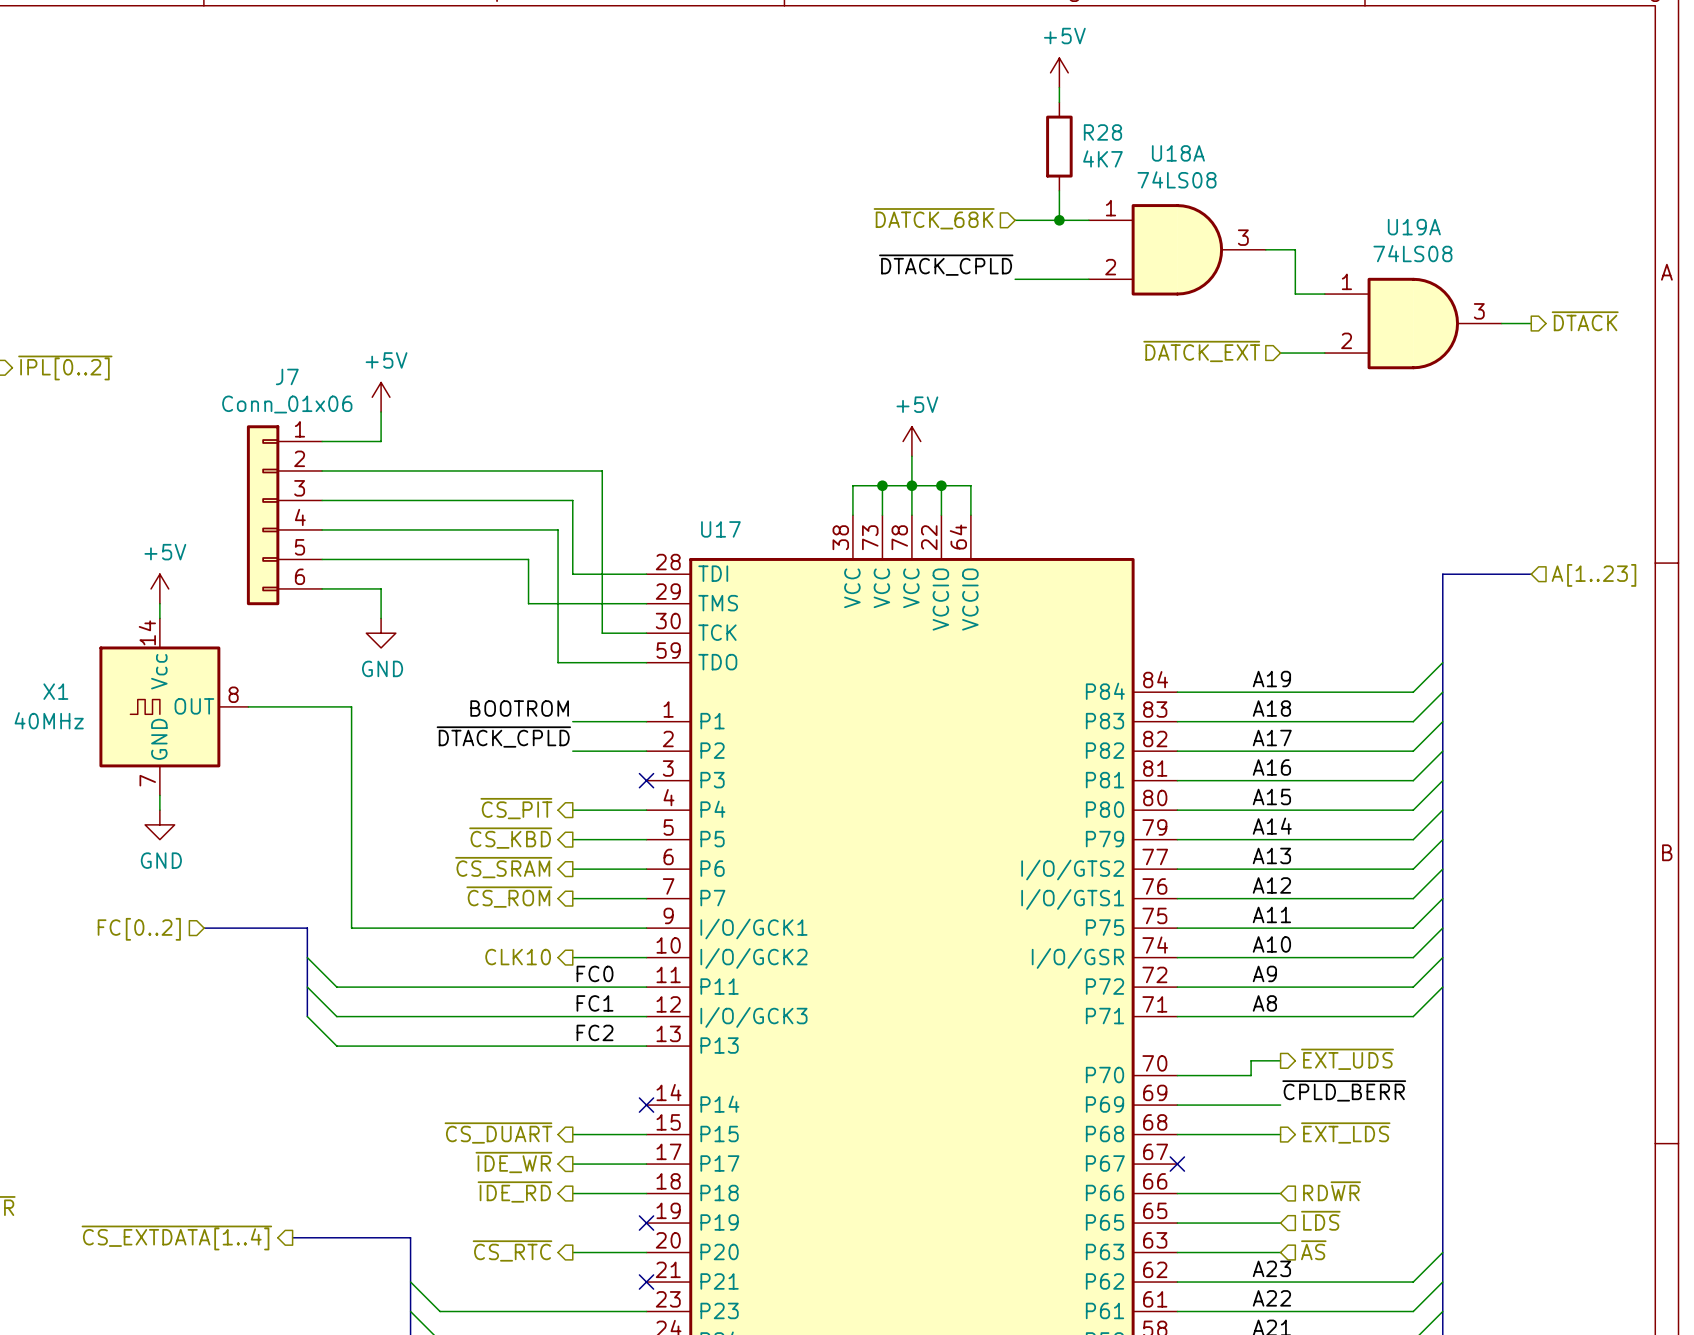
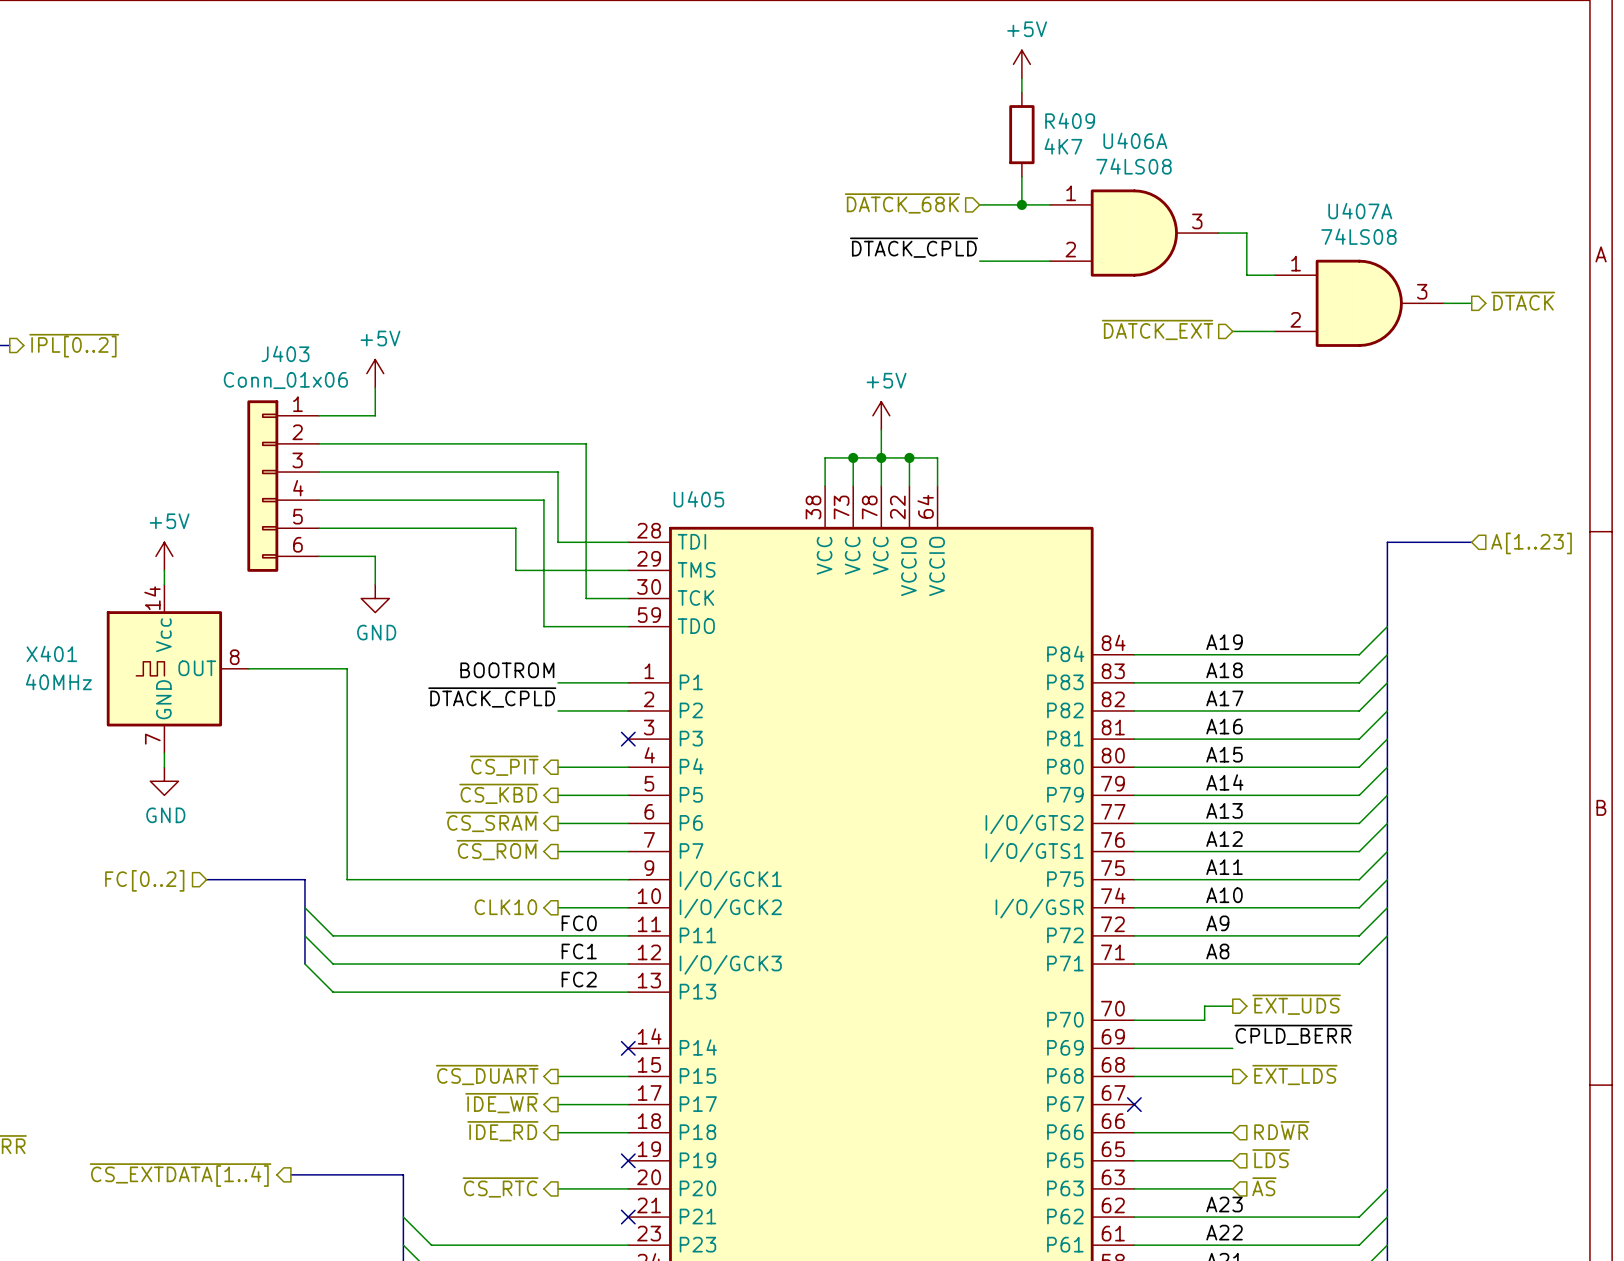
R28 name: R28 (1102, 132) -> R409 (1070, 120)
U18A name: U18A (1178, 153) -> U406A (1135, 140)
U19A name: U19A (1414, 227) -> U407A (1360, 211)
J7 name: J7 (287, 376) -> J403 (285, 353)
U17 name: U17 (720, 529) -> U405 (698, 499)
X1 name: X1 (55, 691) -> X401 (51, 653)

